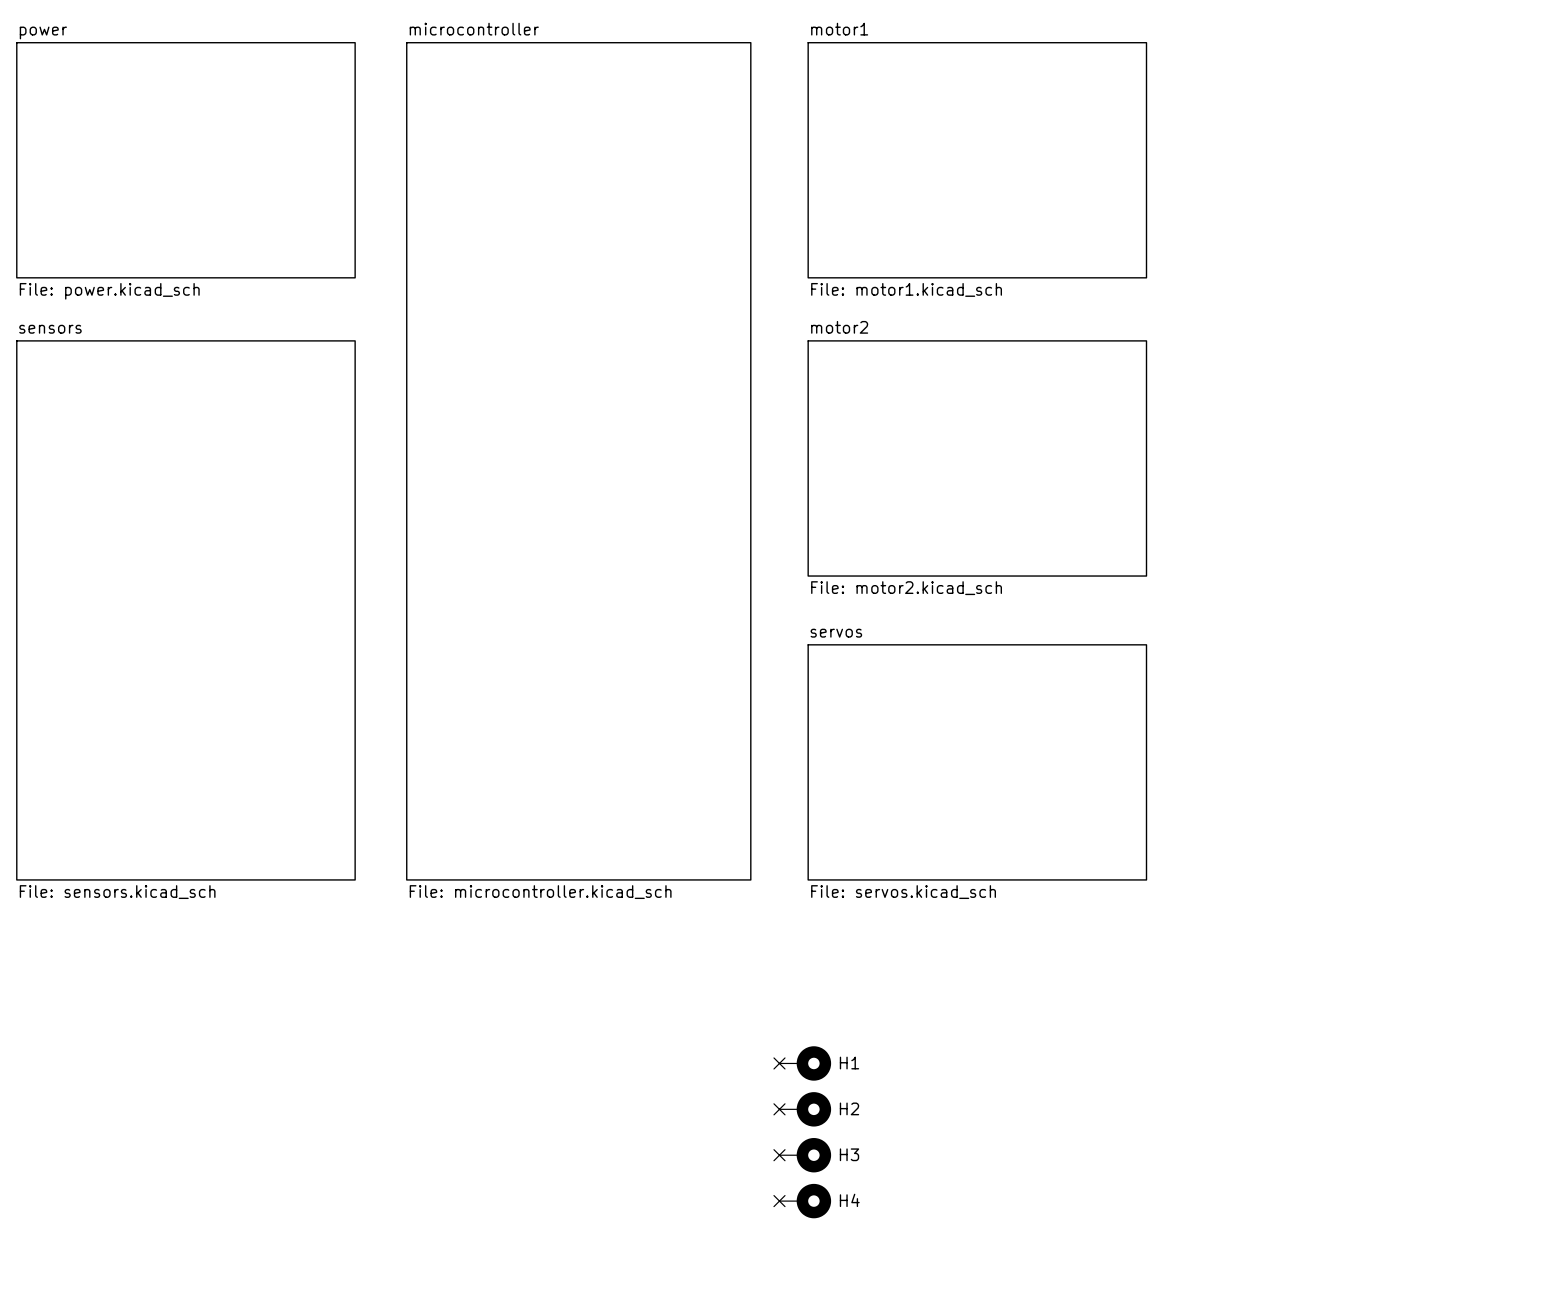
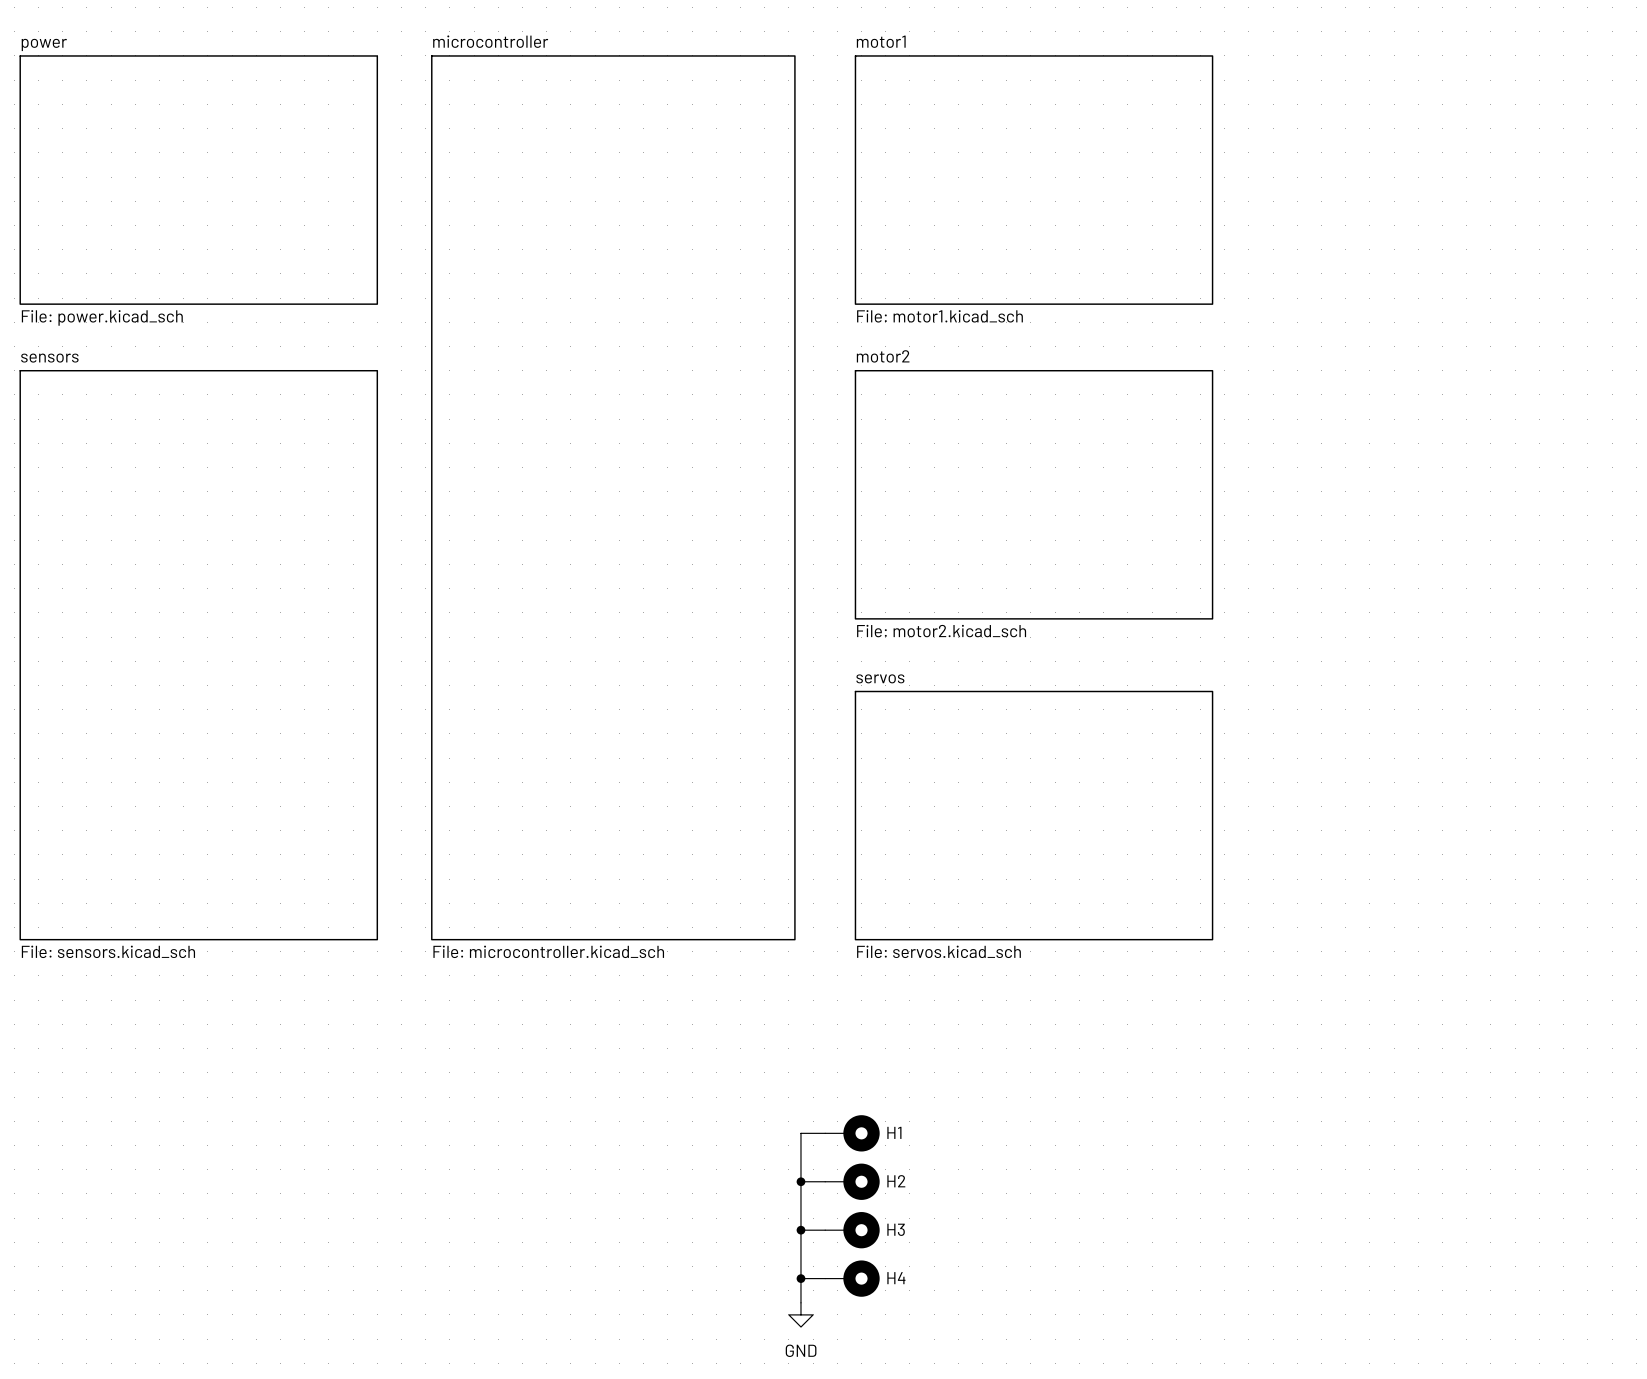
wire: none -> (825, 1133) (800, 1133) (800, 1302)
no-connect mark: (779, 1063) -> none
wire: none -> (800, 1181) (825, 1181)
junction: none -> (800, 1181)
no-connect mark: (779, 1109) -> none
wire: none -> (800, 1230) (825, 1230)
junction: none -> (800, 1230)
no-connect mark: (779, 1155) -> none
wire: none -> (800, 1278) (825, 1278)
junction: none -> (800, 1278)
no-connect mark: (779, 1201) -> none
power symbol: none -> GND (800, 1314)

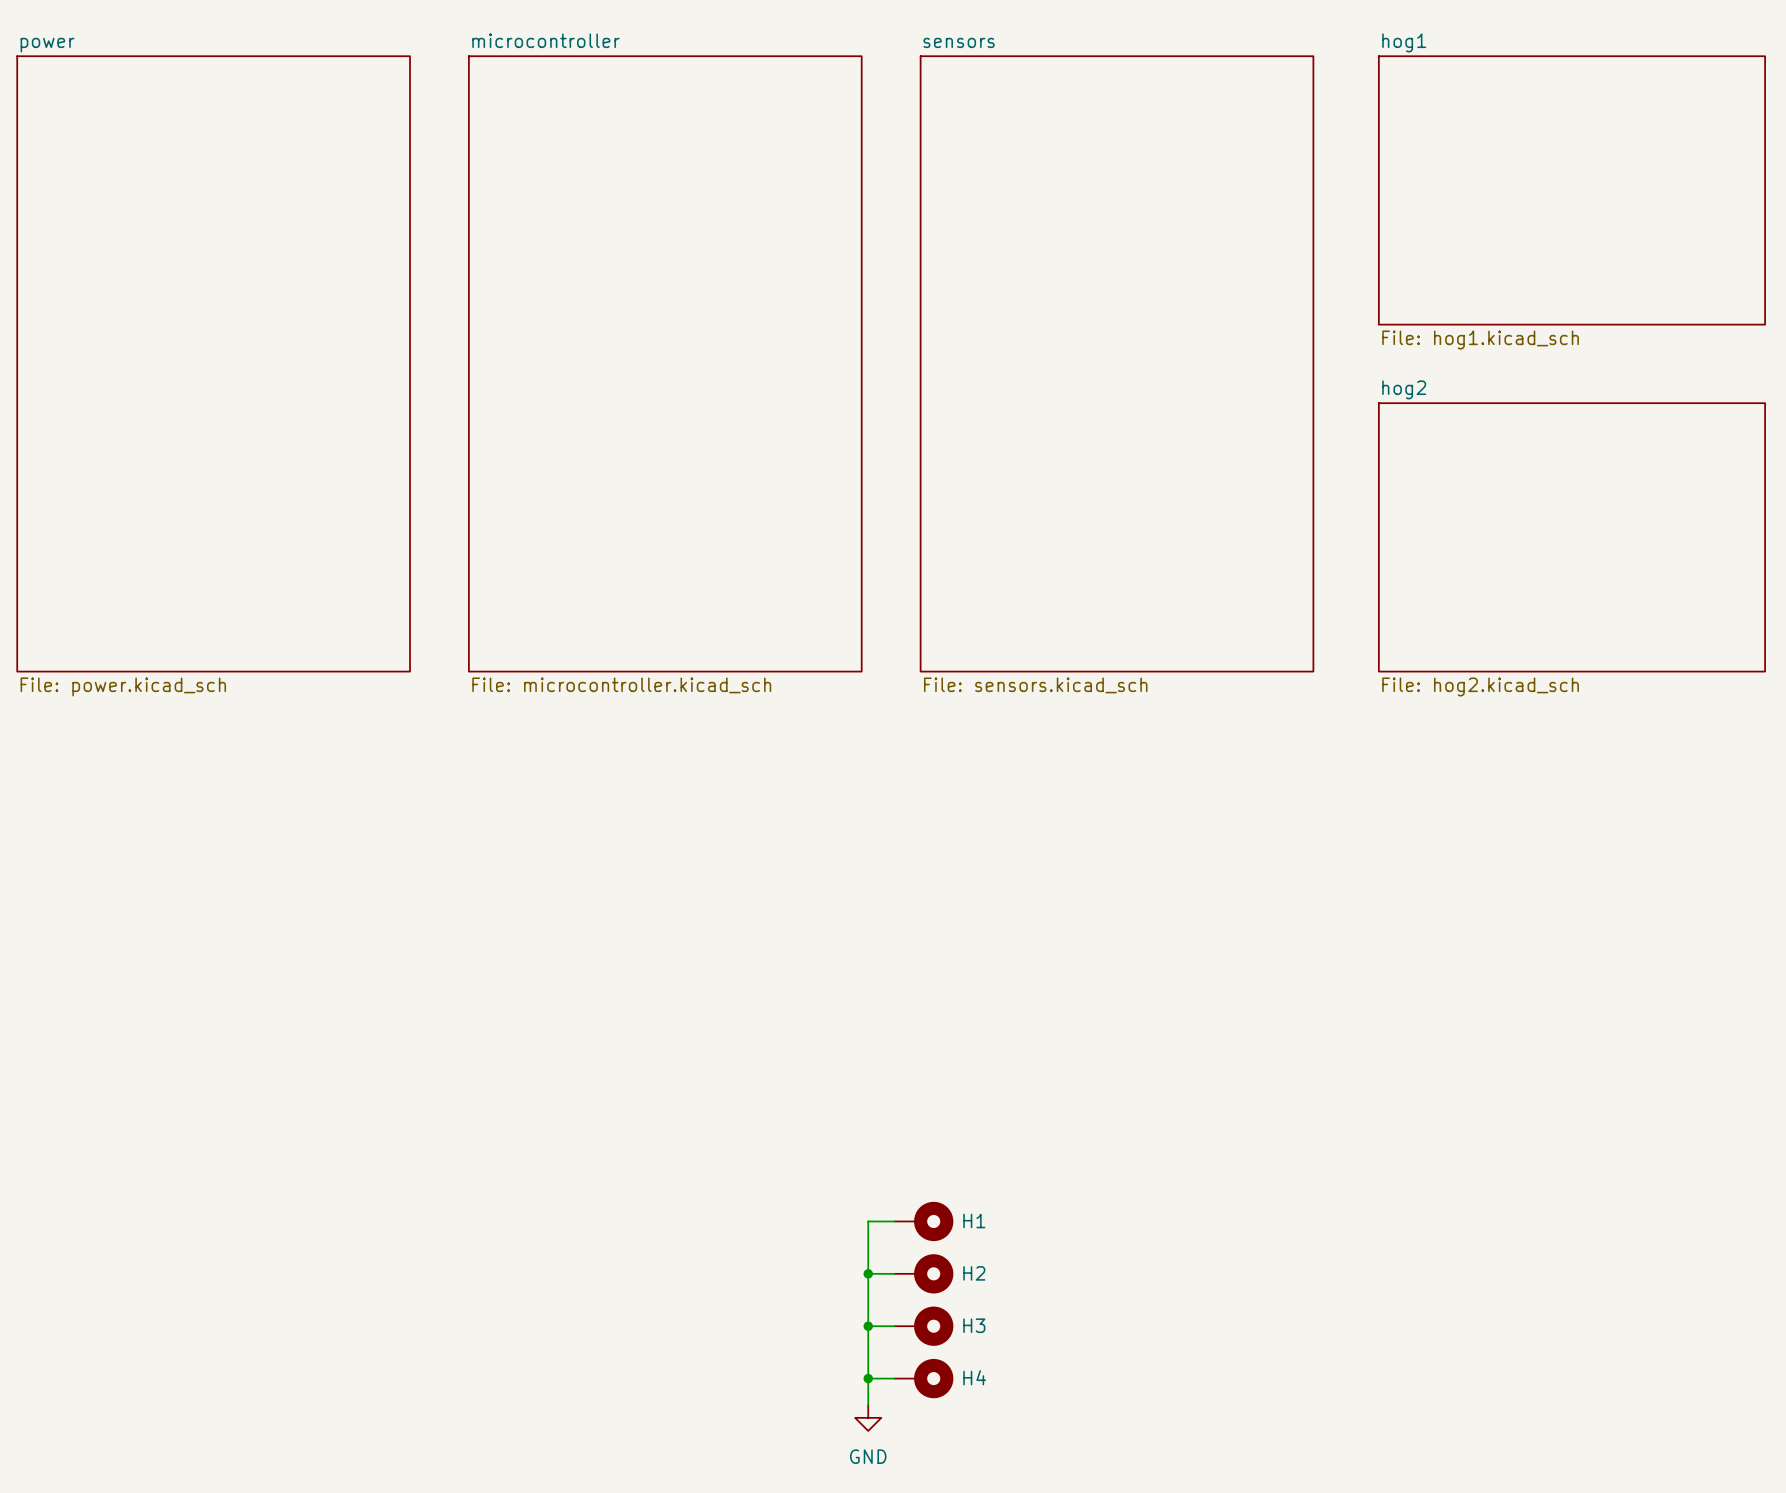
sheet power: File: power.kicad_sch (198, 180) -> none
sheet motor1: File: motor1.kicad_sch (1034, 180) -> none
sheet hog1: none -> File: hog1.kicad_sch (1571, 190)
sheet power: none -> File: power.kicad_sch (213, 363)
sheet microcontroller: none -> File: microcontroller.kicad_sch (665, 363)
sheet sensors: none -> File: sensors.kicad_sch (1117, 363)
sheet motor2: File: motor2.kicad_sch (1034, 494) -> none
sheet microcontroller: File: microcontroller.kicad_sch (613, 497) -> none
sheet hog2: none -> File: hog2.kicad_sch (1571, 537)
sheet sensors: File: sensors.kicad_sch (198, 655) -> none
sheet servos: File: servos.kicad_sch (1034, 815) -> none

